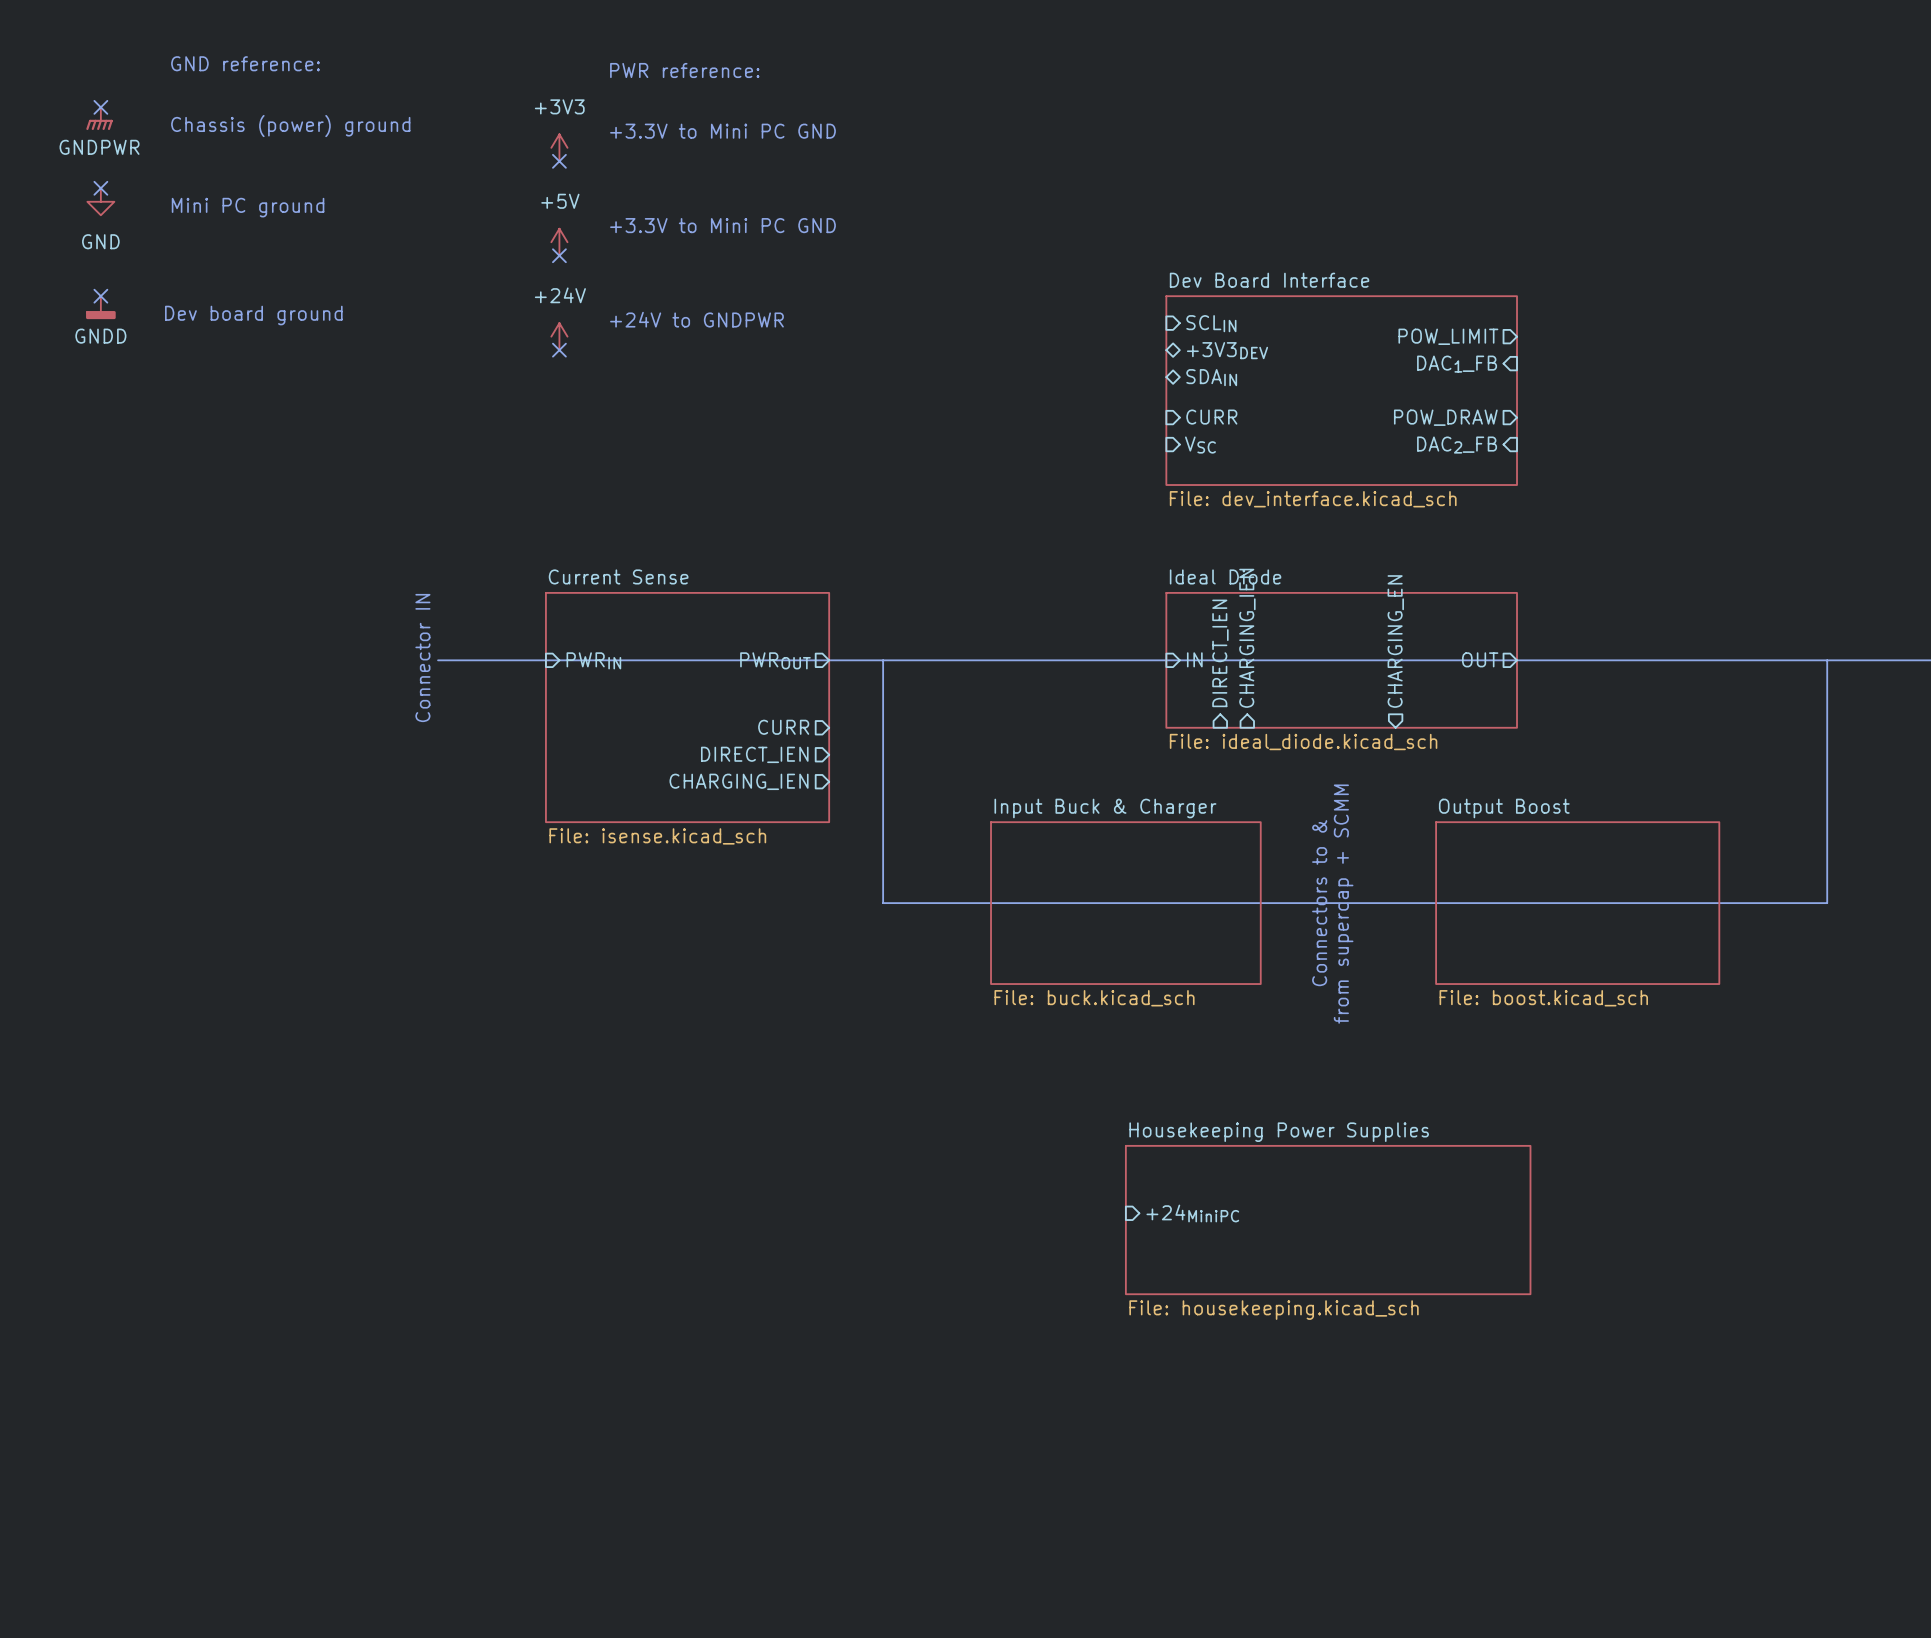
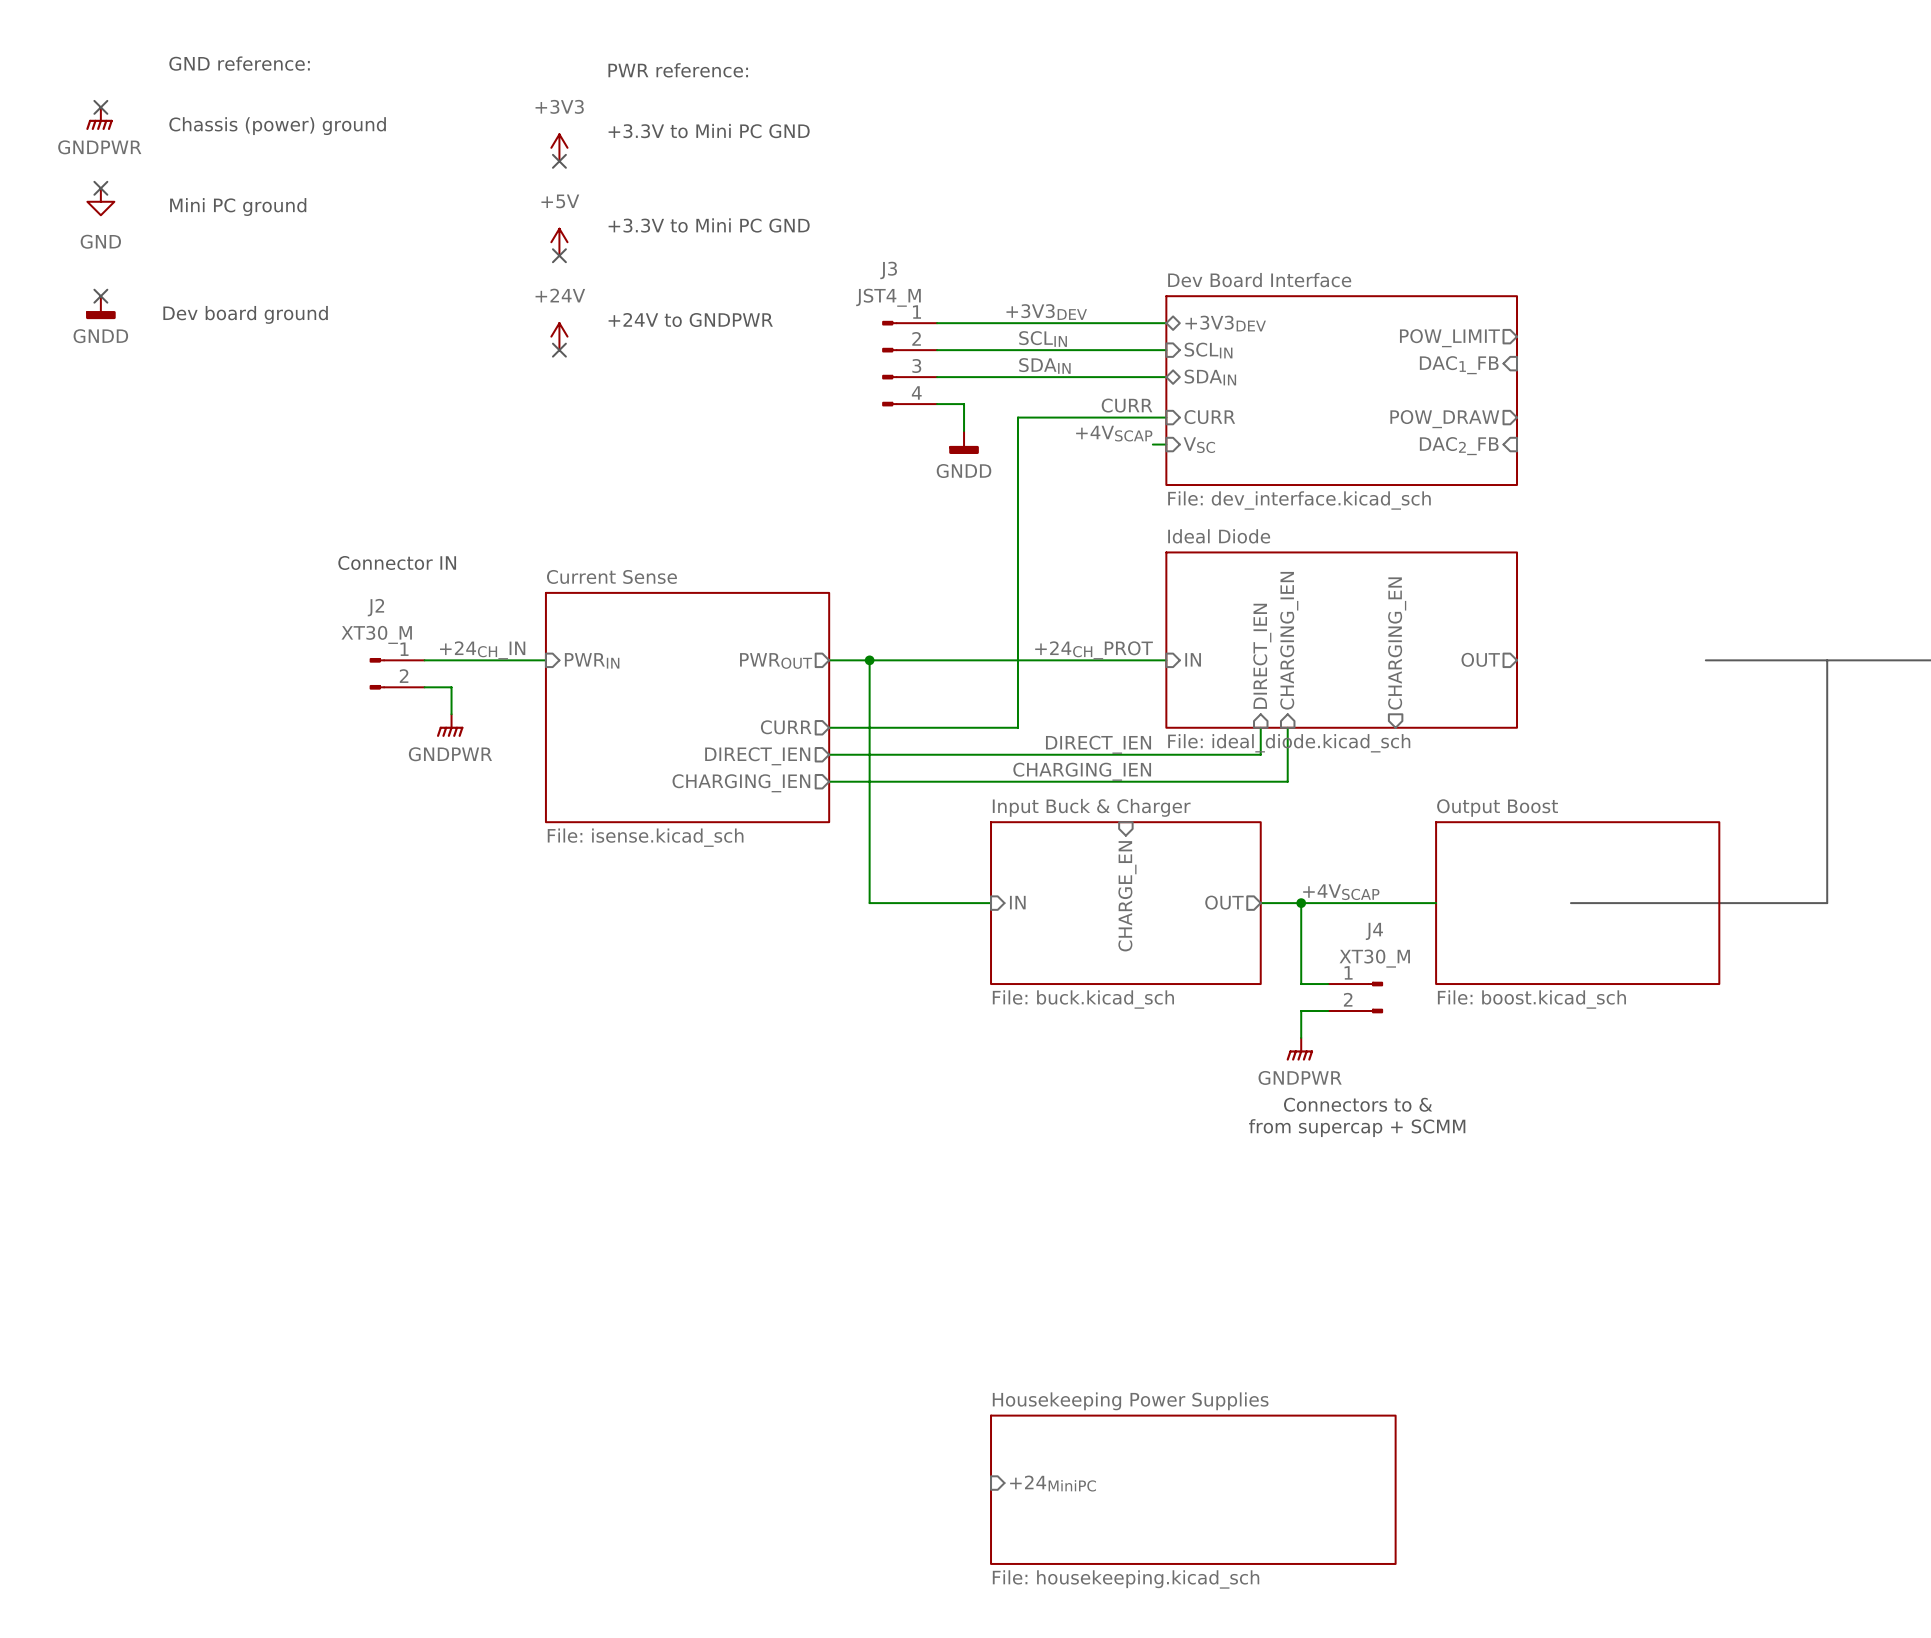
label: none -> +3V3DEV (1046, 312)
wire: none -> (937, 323) (1166, 323)
sheet pin shape: input (1211, 323) -> bidirectional (1225, 323)
sheet pin: SCLIN (1211, 323) -> +3V3DEV (1225, 323)
label: none -> SCLIN (1043, 338)
wire: none -> (937, 350) (1166, 350)
sheet pin shape: bidirectional (1227, 350) -> input (1208, 350)
sheet pin: +3V3DEV (1227, 350) -> SCLIN (1208, 350)
J3: none -> JST4_M (909, 363)
label: none -> SDAIN (1044, 365)
wire: none -> (937, 377) (1166, 377)
wire: none -> (937, 404) (964, 404) (964, 431)
label: none -> CURR (1127, 405)
wire: none -> (1166, 417) (1017, 417) (1017, 727) (829, 727)
label: none -> +4VSCAP (1114, 433)
power symbol: none -> GNDD (964, 442)
wire: none -> (1152, 444) (1166, 444)
sheet pin position: CHARGING_IEN (1247, 638) -> CHARGING_IEN (1289, 640)
sheet Ideal Diode: none -> File: ideal_diode.kicad_sch (1341, 640)
label: none -> +24CH_IN (482, 650)
label: none -> +24CH_PROT (1094, 650)
sheet pin position: DIRECT_IEN (1220, 653) -> DIRECT_IEN (1262, 656)
text rotation: 0° (422, 658) -> 90° clockwise (397, 562)
line: (438, 660) (1705, 660) -> none
wire: none -> (869, 660) (869, 903) (991, 903)
junction: none -> (869, 660)
line: (883, 660) (883, 903) (1570, 903) -> none
sheet Ideal Diode: File: ideal_diode.kicad_sch (1341, 660) -> none
J2: none -> XT30_M (397, 673)
wire: none -> (424, 687) (451, 687) (451, 714)
power symbol: none -> GNDPWR (450, 725)
wire: none -> (1260, 727) (1260, 754) (829, 754)
wire: none -> (1287, 727) (1287, 781) (829, 781)
label: none -> DIRECT_IEN (1098, 744)
label: none -> CHARGING_IEN (1082, 771)
label: none -> +4VSCAP (1341, 892)
sheet pin: none -> CHARGE_EN (1127, 896)
sheet pin: none -> IN (1017, 902)
sheet pin: none -> OUT (1224, 902)
wire: none -> (1301, 903) (1301, 984) (1328, 984)
junction: none -> (1301, 903)
text rotation: 0° (1319, 903) -> 90° clockwise (1358, 1104)
text position: Connectors to & (1319, 903) -> Connectors to & (1358, 1104)
text rotation: 0° (1343, 904) -> 90° clockwise (1357, 1128)
J4: none -> XT30_M (1355, 997)
wire: none -> (1328, 1011) (1301, 1011) (1301, 1037)
power symbol: none -> GNDPWR (1299, 1049)
sheet pin: +24MiniPC (1192, 1213) -> none
sheet Housekeeping Power Supplies: File: housekeeping.kicad_sch (1328, 1220) -> none
sheet pin: none -> +24MiniPC (1053, 1483)
sheet Housekeeping Power Supplies: none -> File: housekeeping.kicad_sch (1193, 1489)

